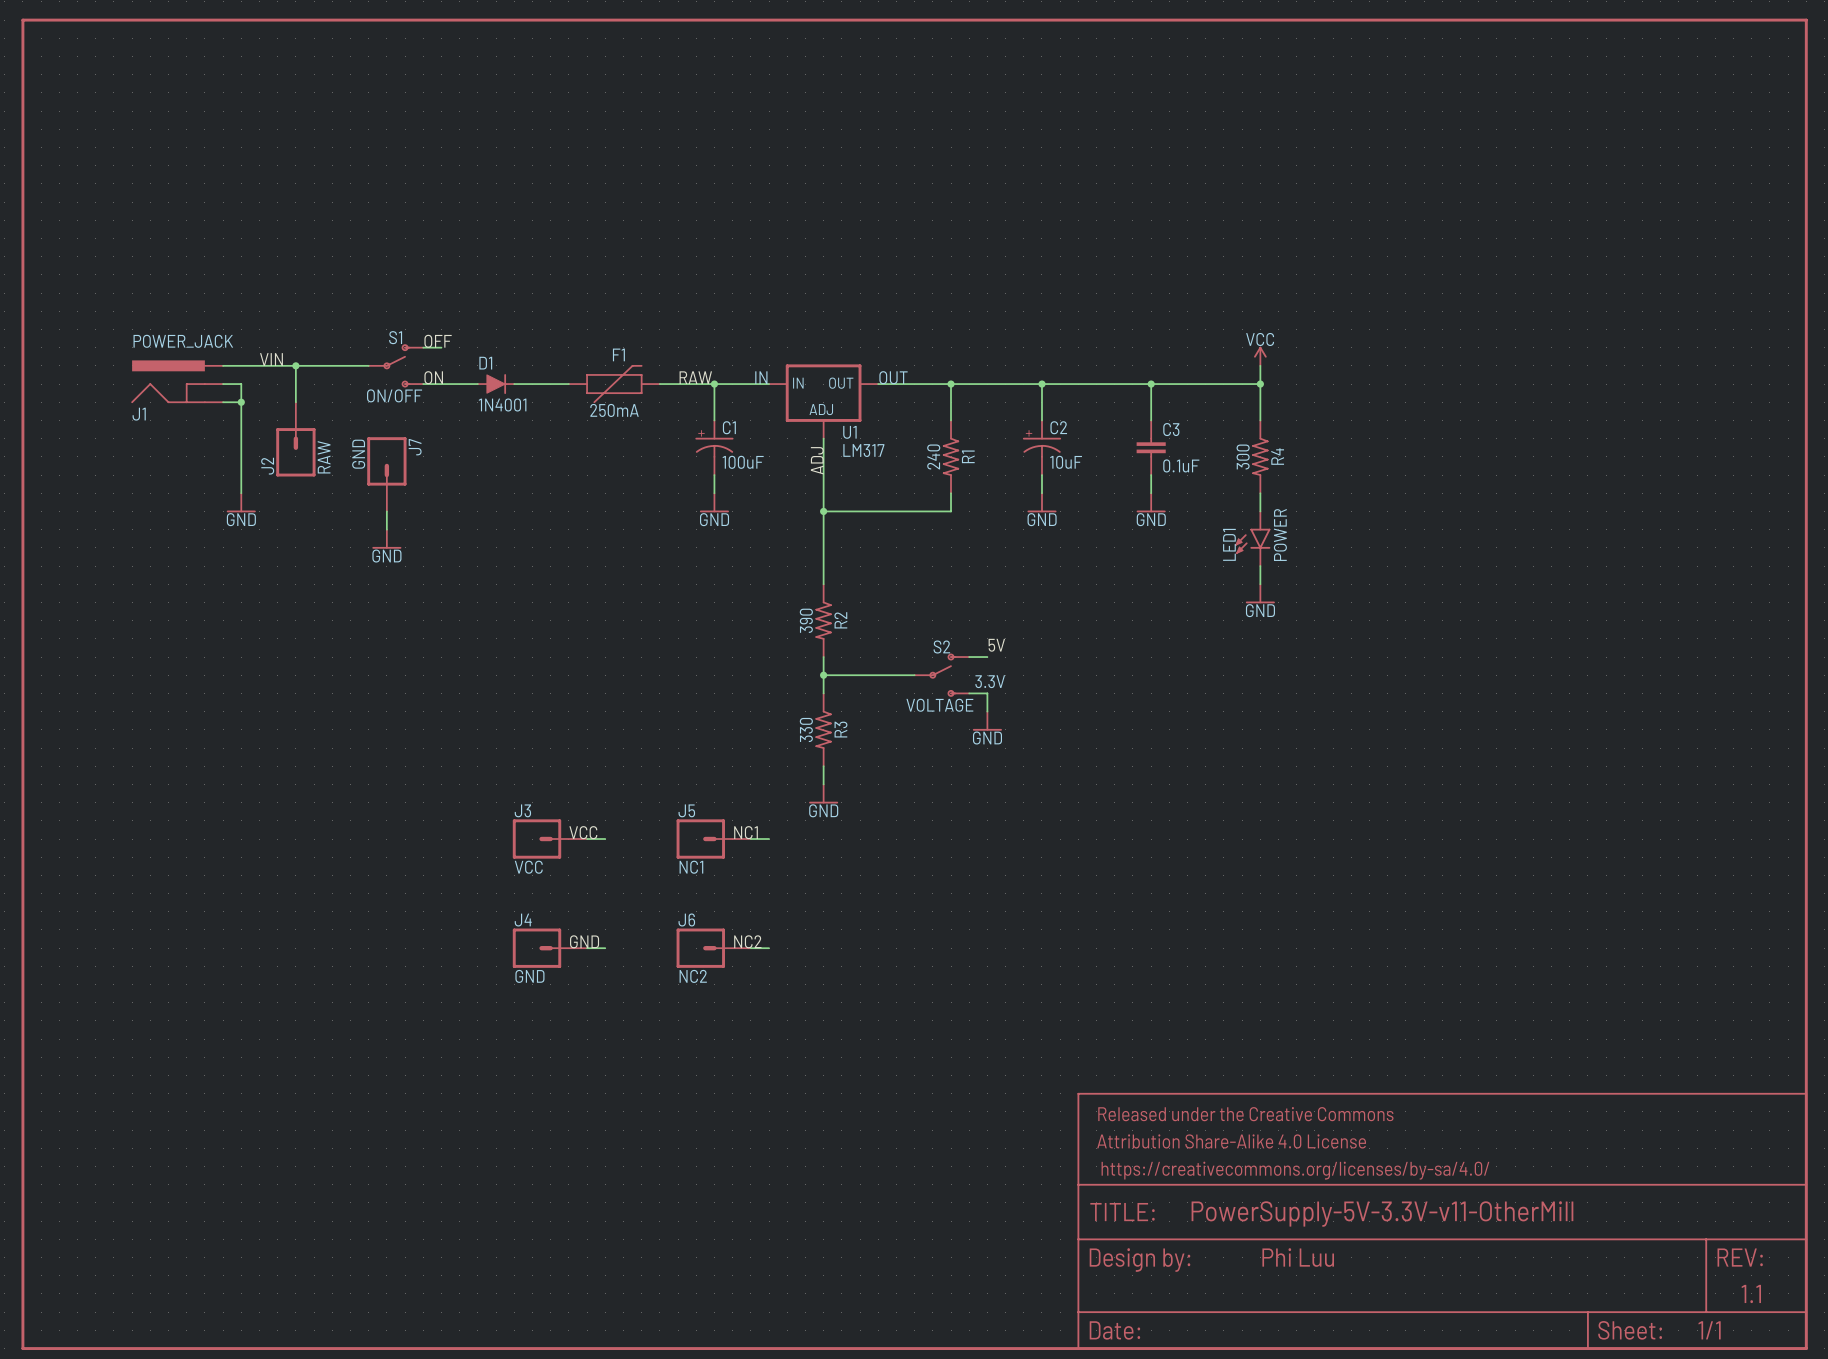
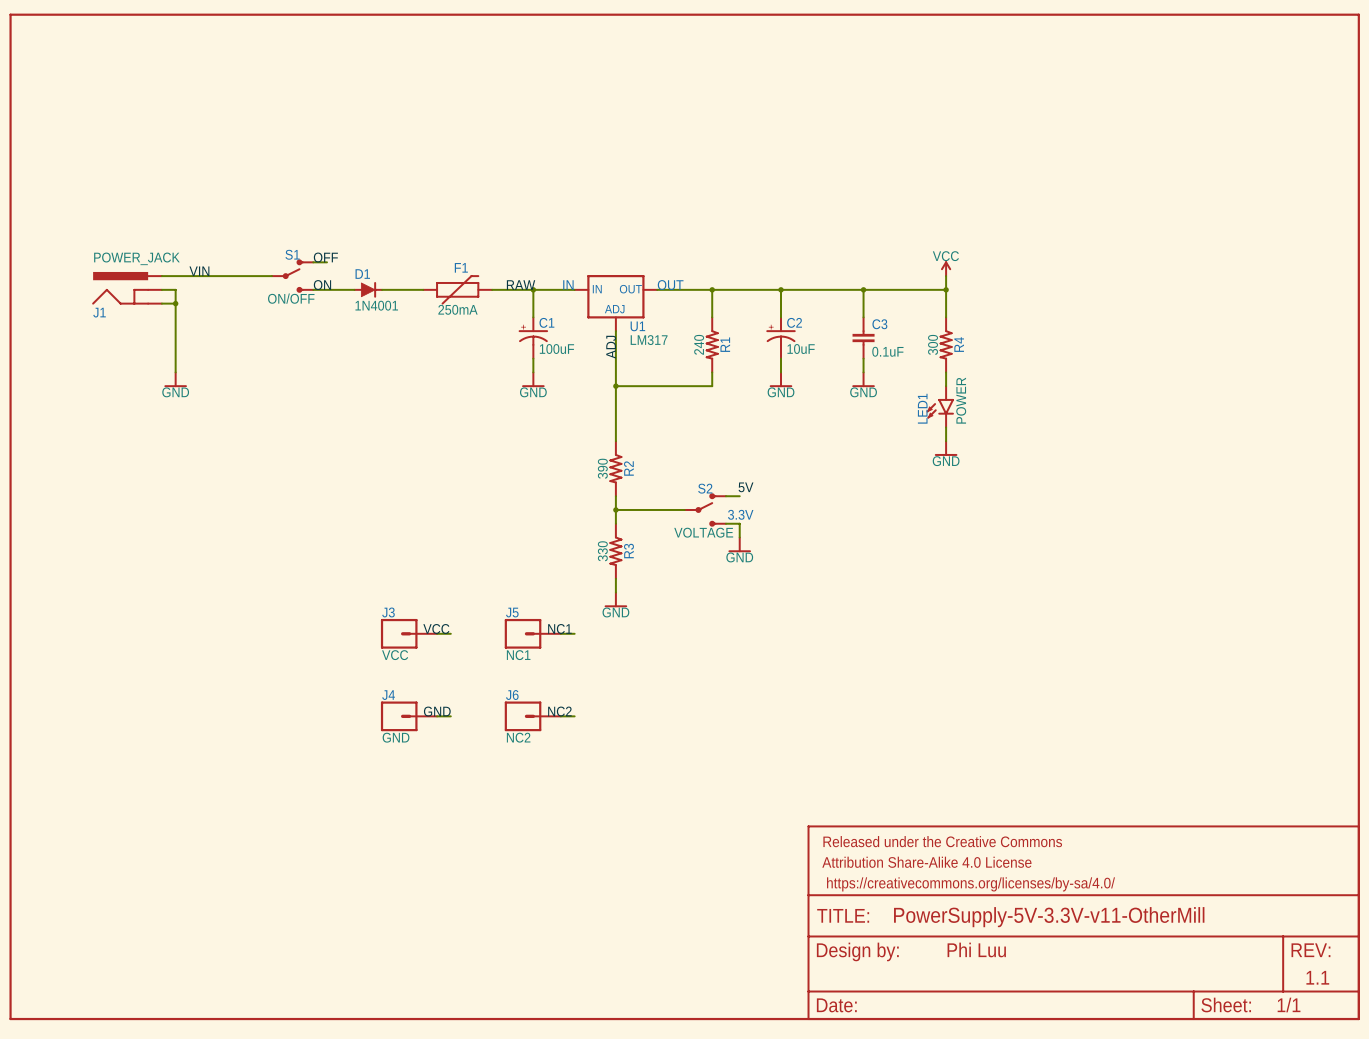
wire: (295, 365) (295, 402) -> none
junction: (295, 365) -> none
J2: RAW (295, 439) -> none
J7: GND (386, 474) -> none
wire: (386, 511) (386, 529) -> none
power symbol: GND (386, 539) -> none

